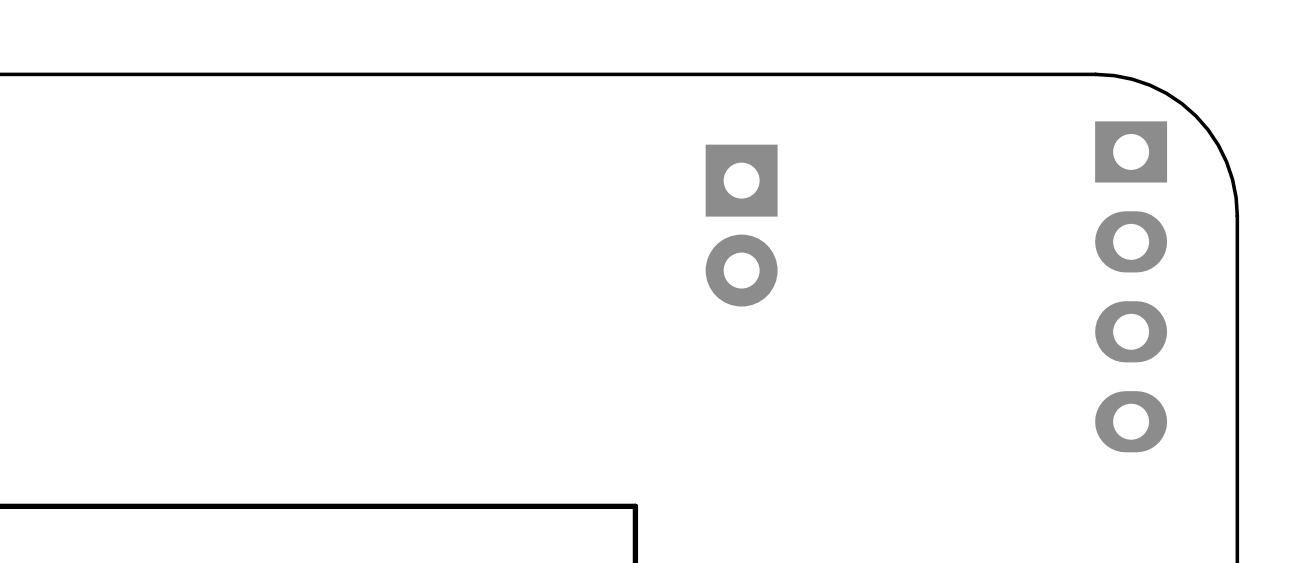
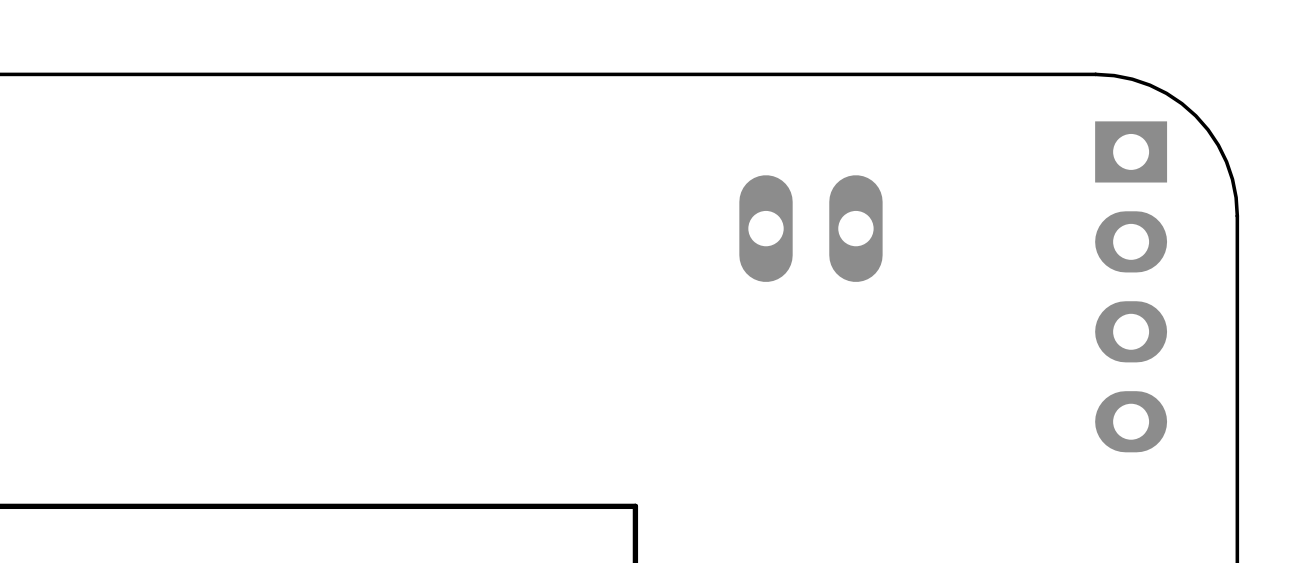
part: (741, 225) -> none
part: none -> (810, 228)

